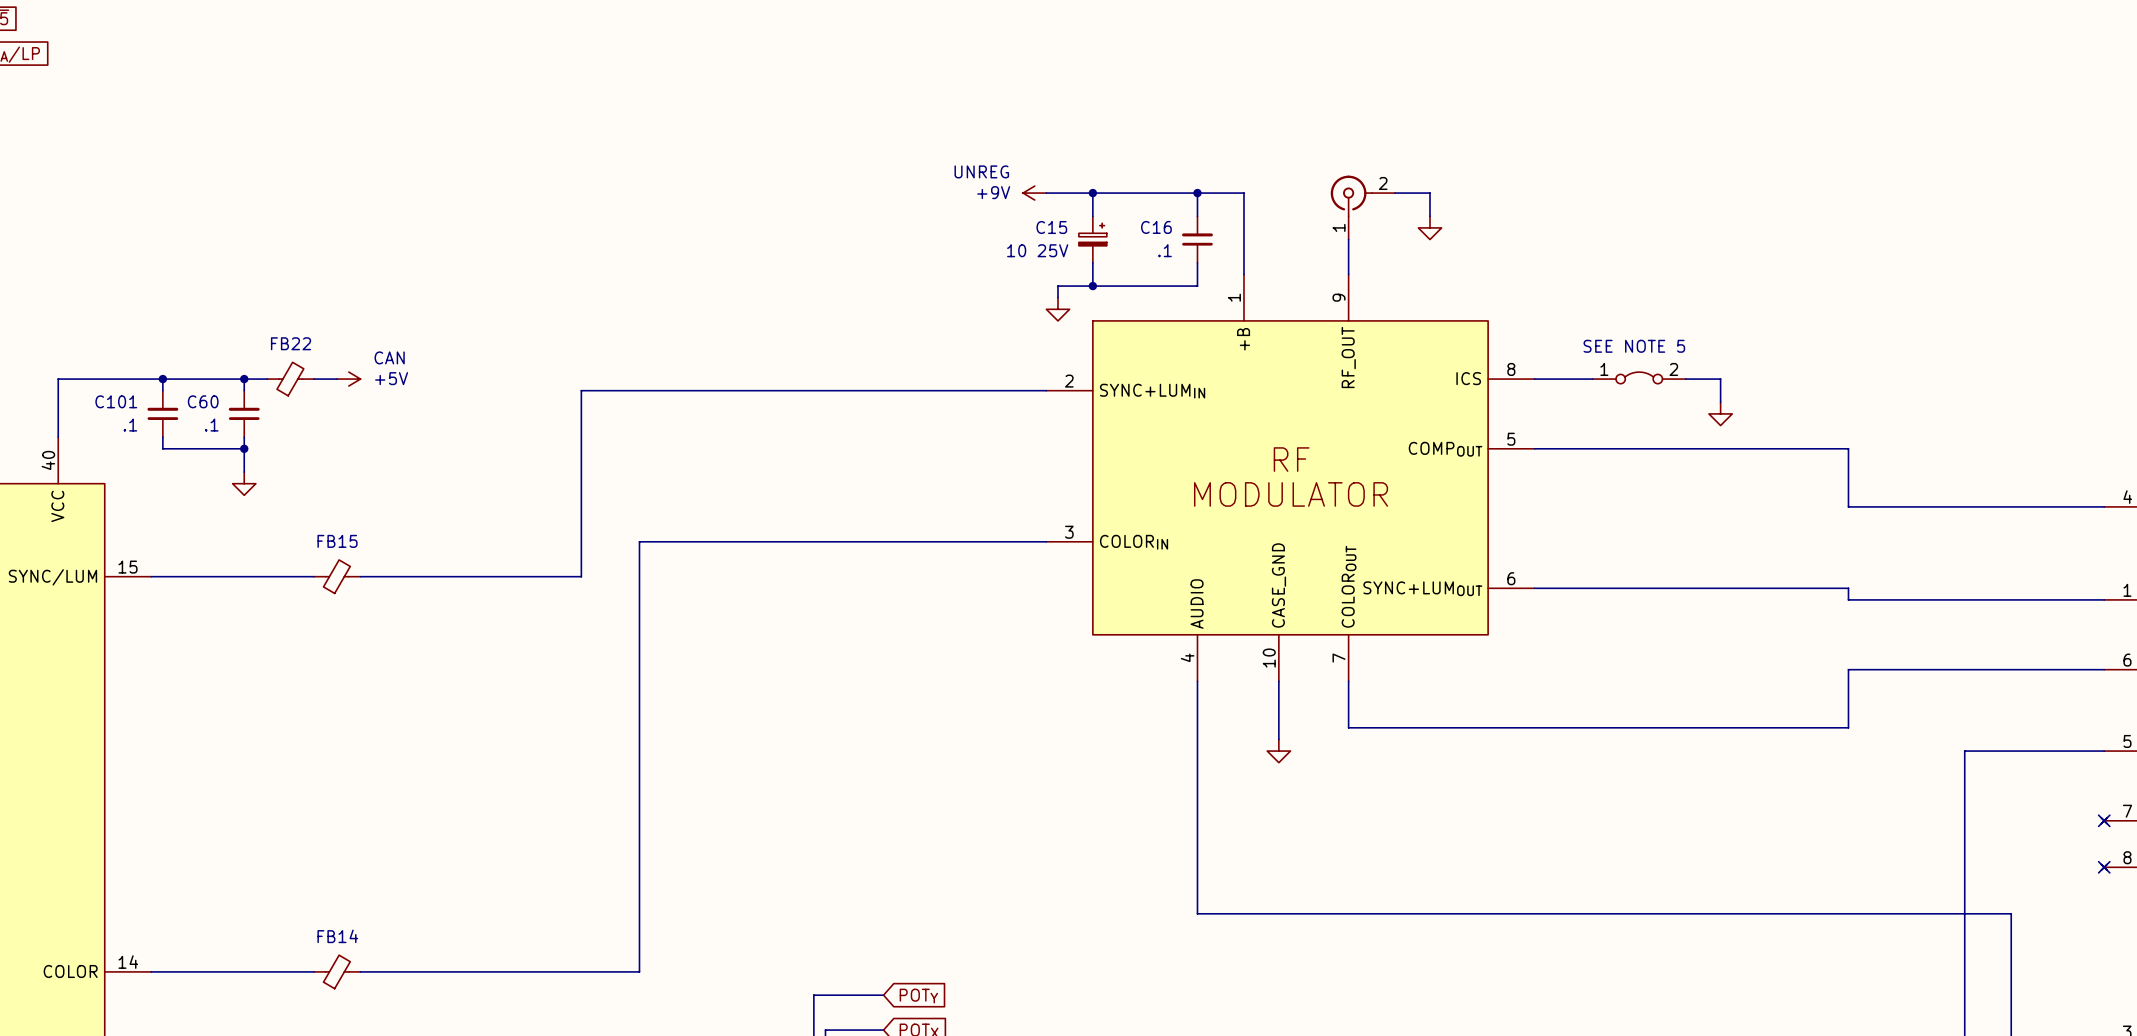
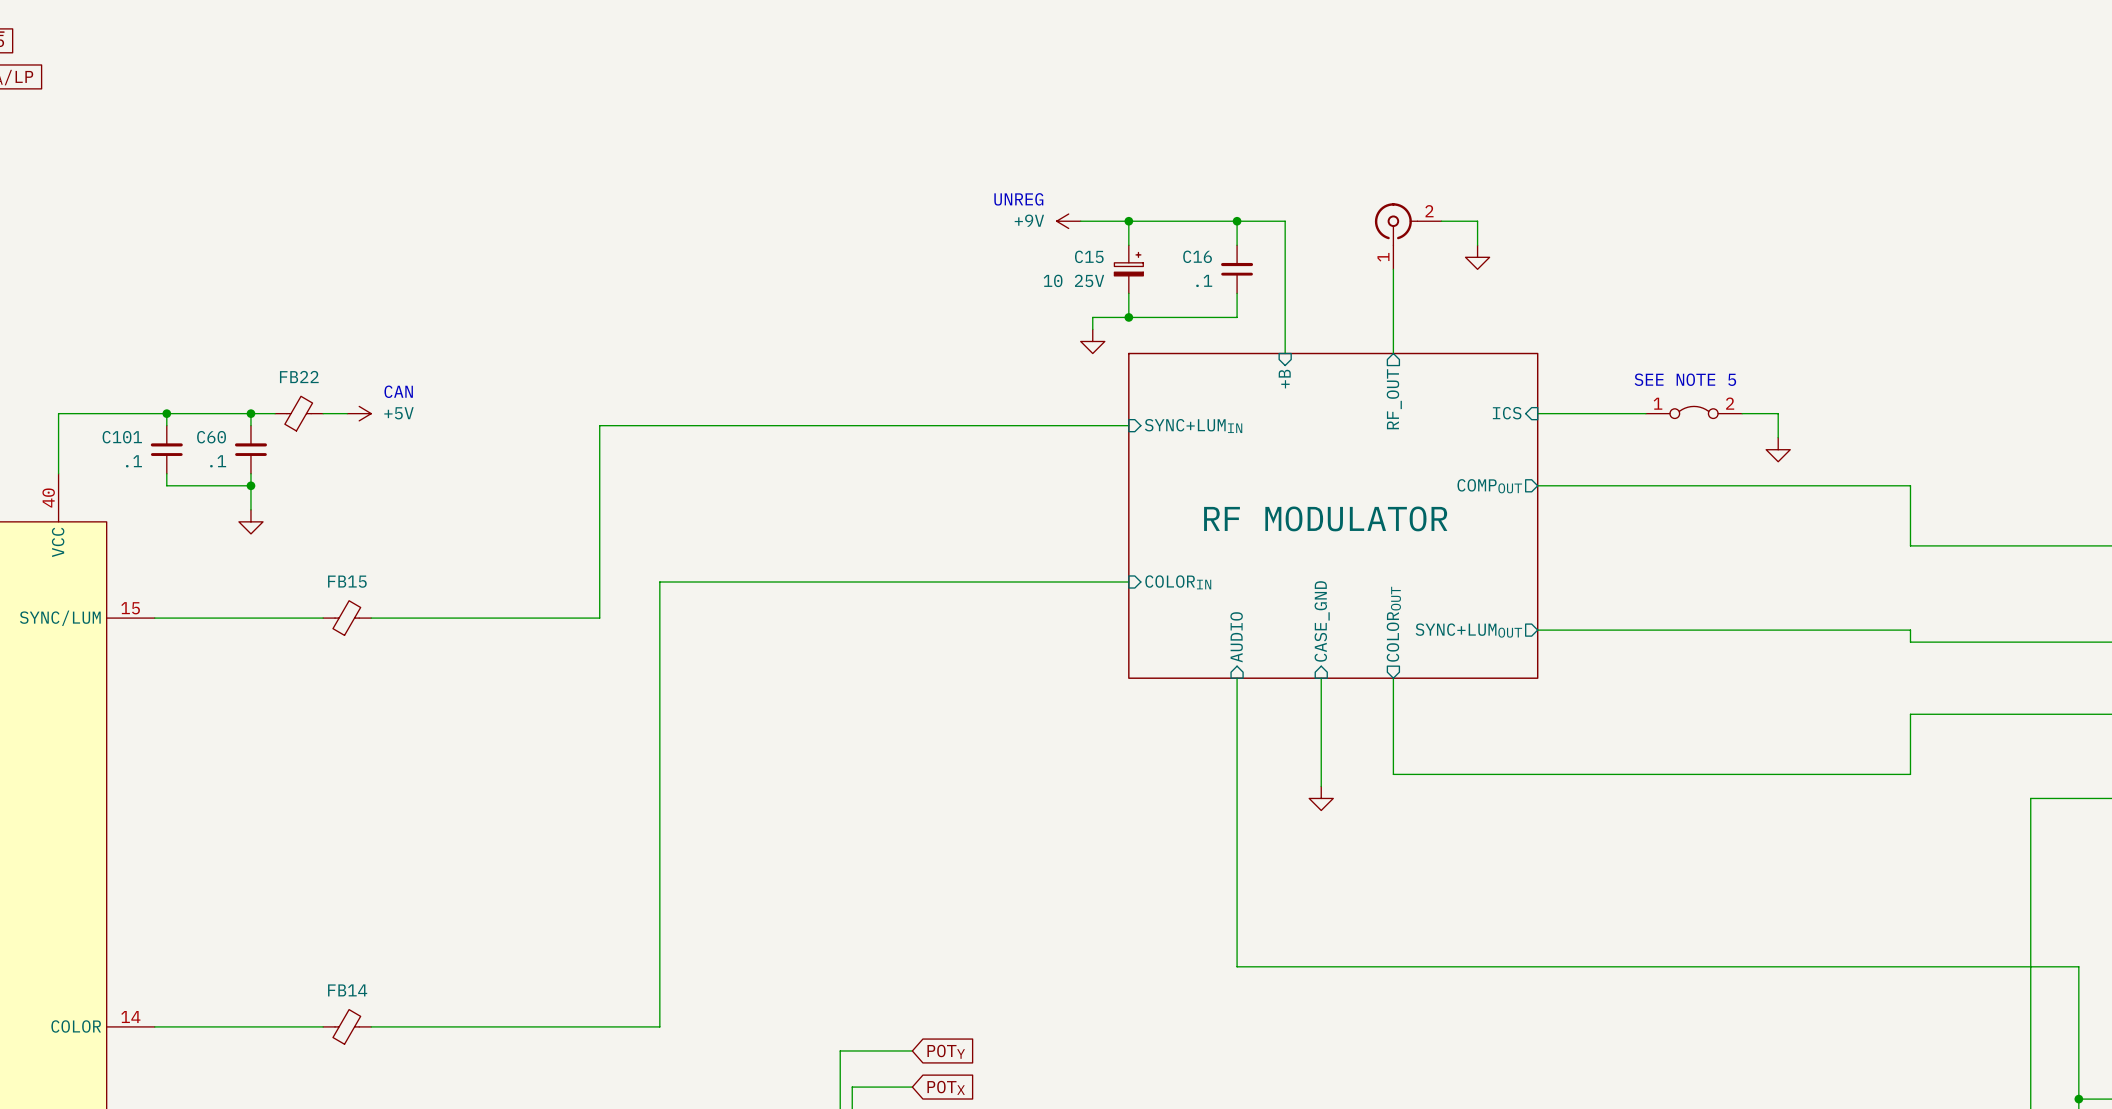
sheet pin: none -> +B (1284, 379)
sheet pin: none -> RF_OUT (1394, 399)
sheet pin: none -> ICS (1507, 413)
sheet pin: none -> SYNC+LUMIN (1193, 426)
sheet pin: none -> COMPOUT (1489, 486)
part: (1290, 477) -> none
sheet RF MODULATOR: none -> (1333, 515)
sheet pin: none -> COLORIN (1178, 582)
sheet pin: none -> CASE_GND (1322, 621)
sheet pin: none -> COLOROUT (1393, 624)
sheet pin: none -> SYNC+LUMOUT (1468, 630)
sheet pin: none -> AUDIO (1236, 637)

